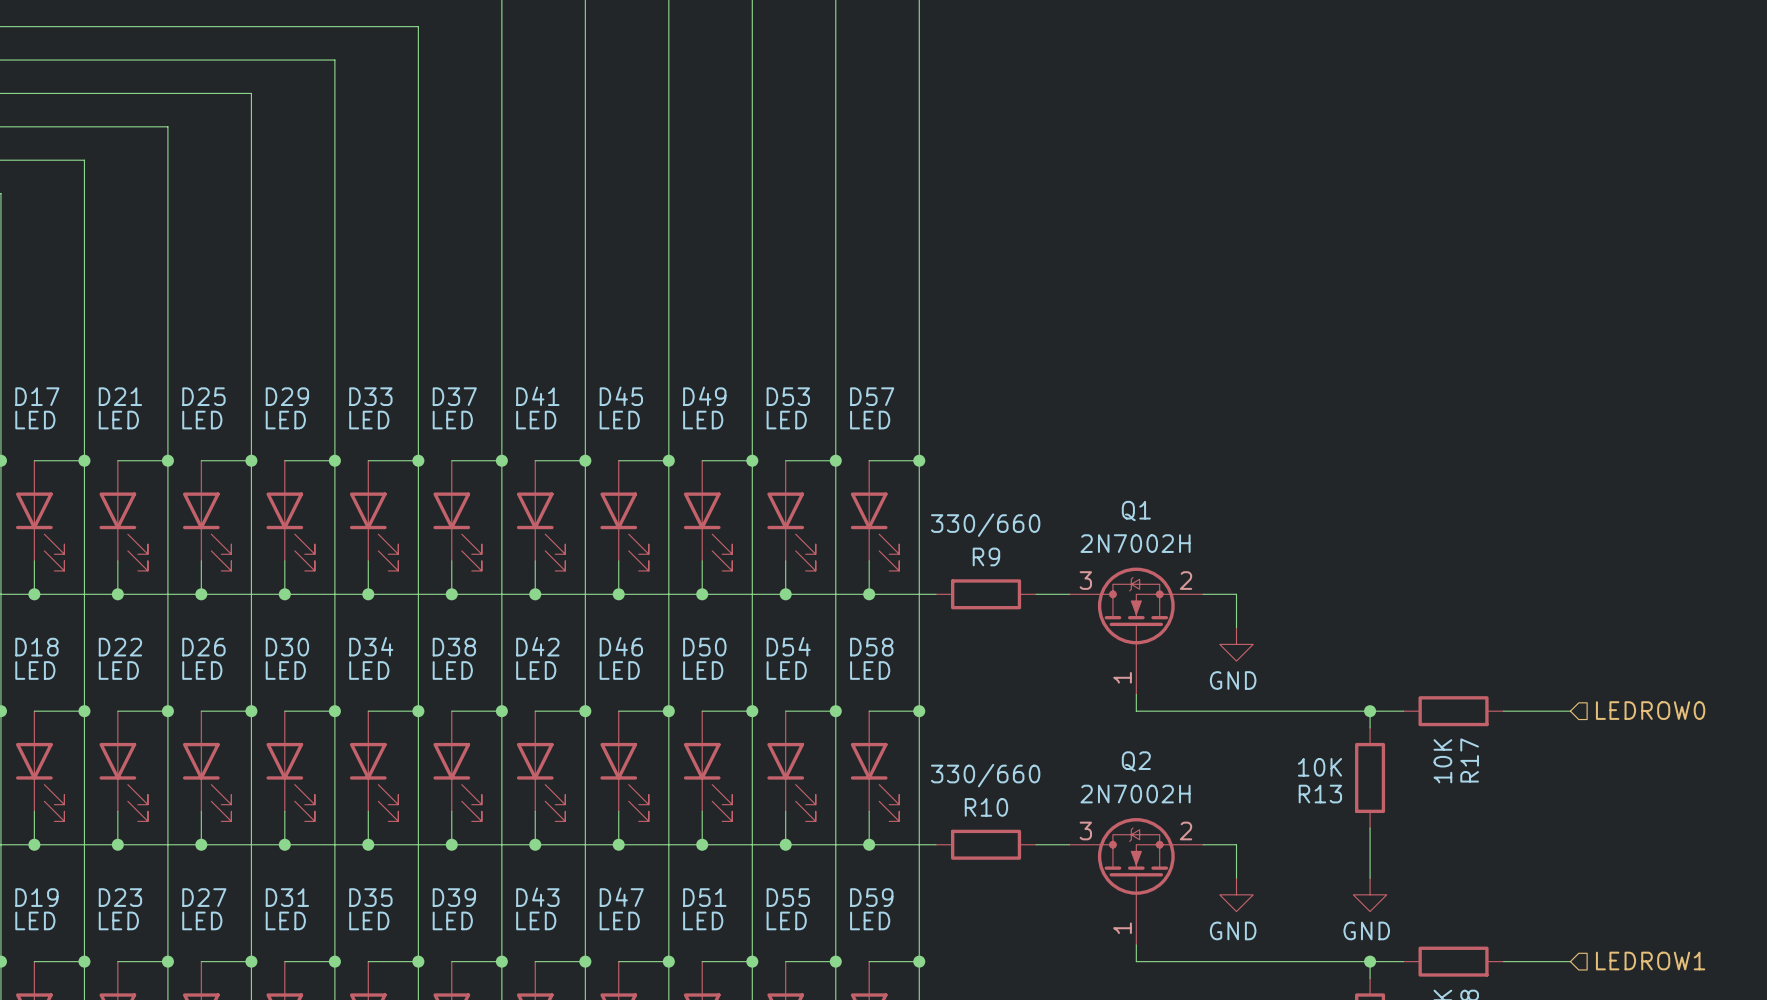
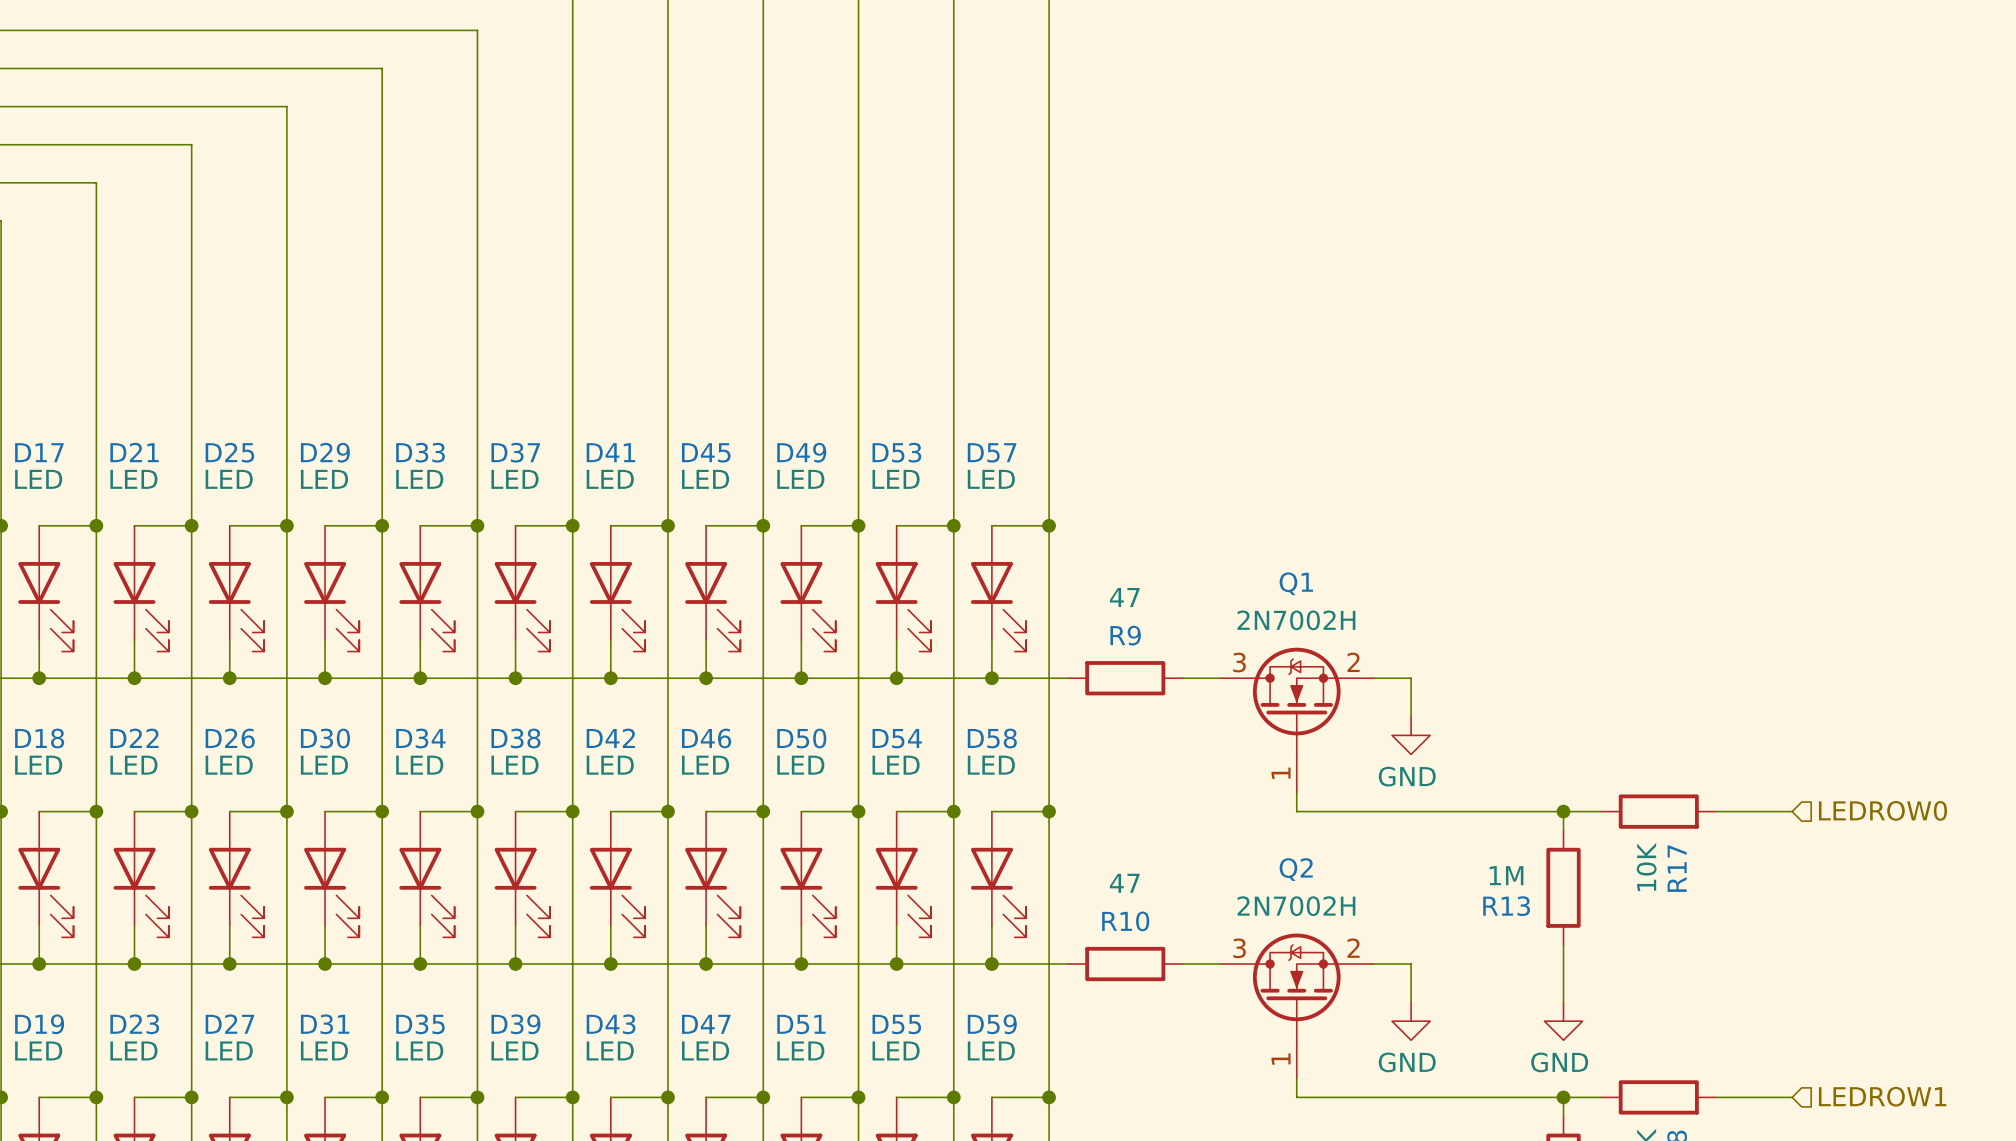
R9 value: 330/660 (985, 525) -> 47 (1124, 597)
R13 value: 10K (1319, 767) -> 1M (1506, 875)
R10 value: 330/660 (985, 775) -> 47 (1124, 883)

